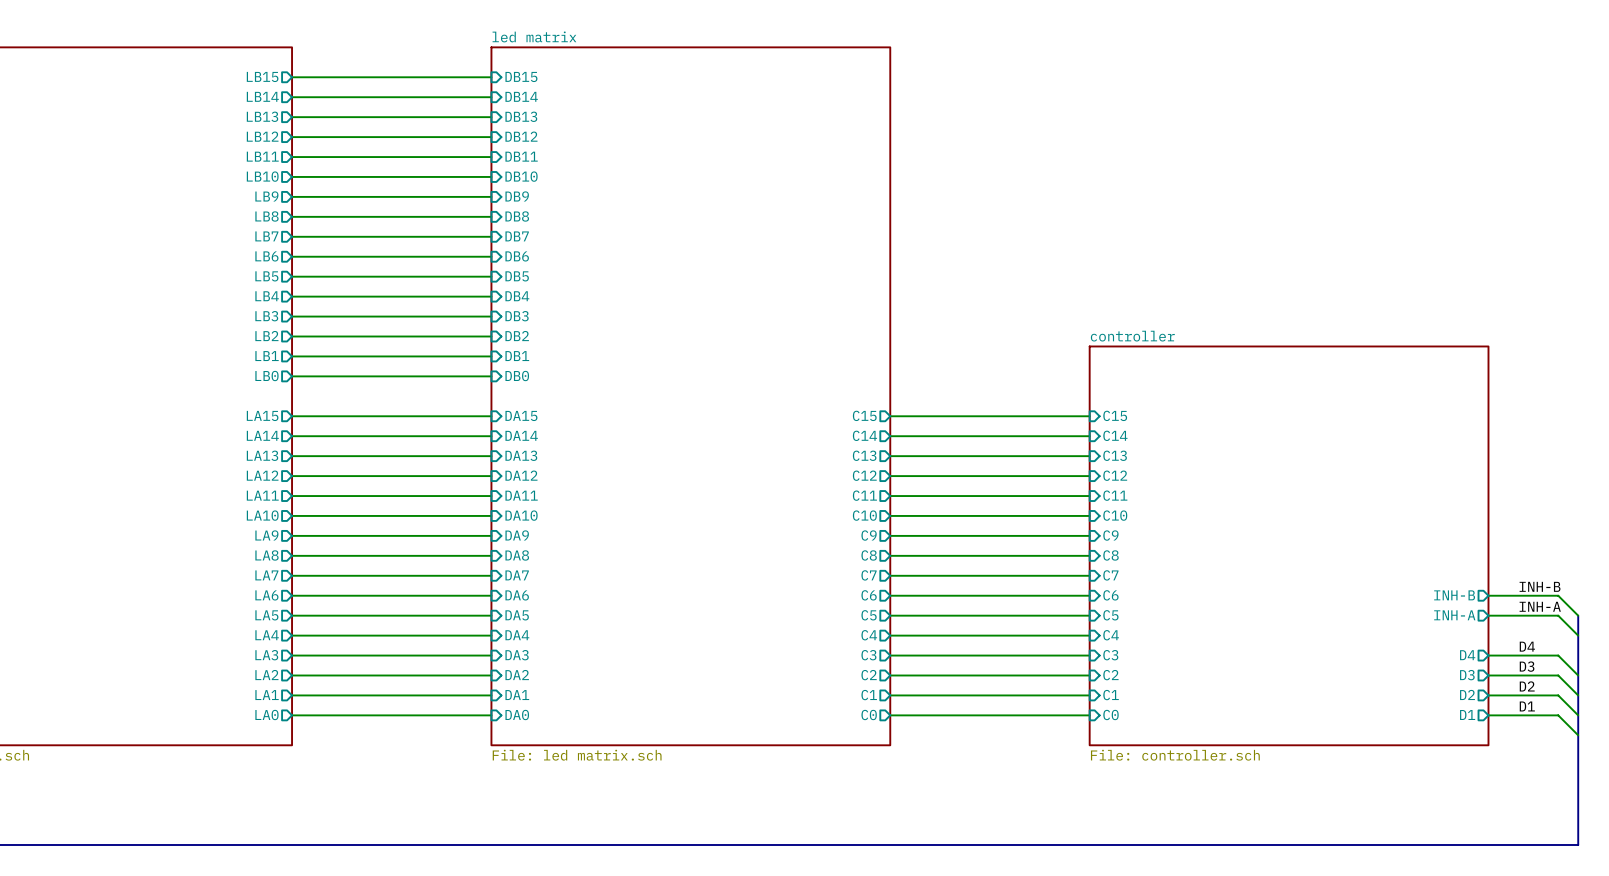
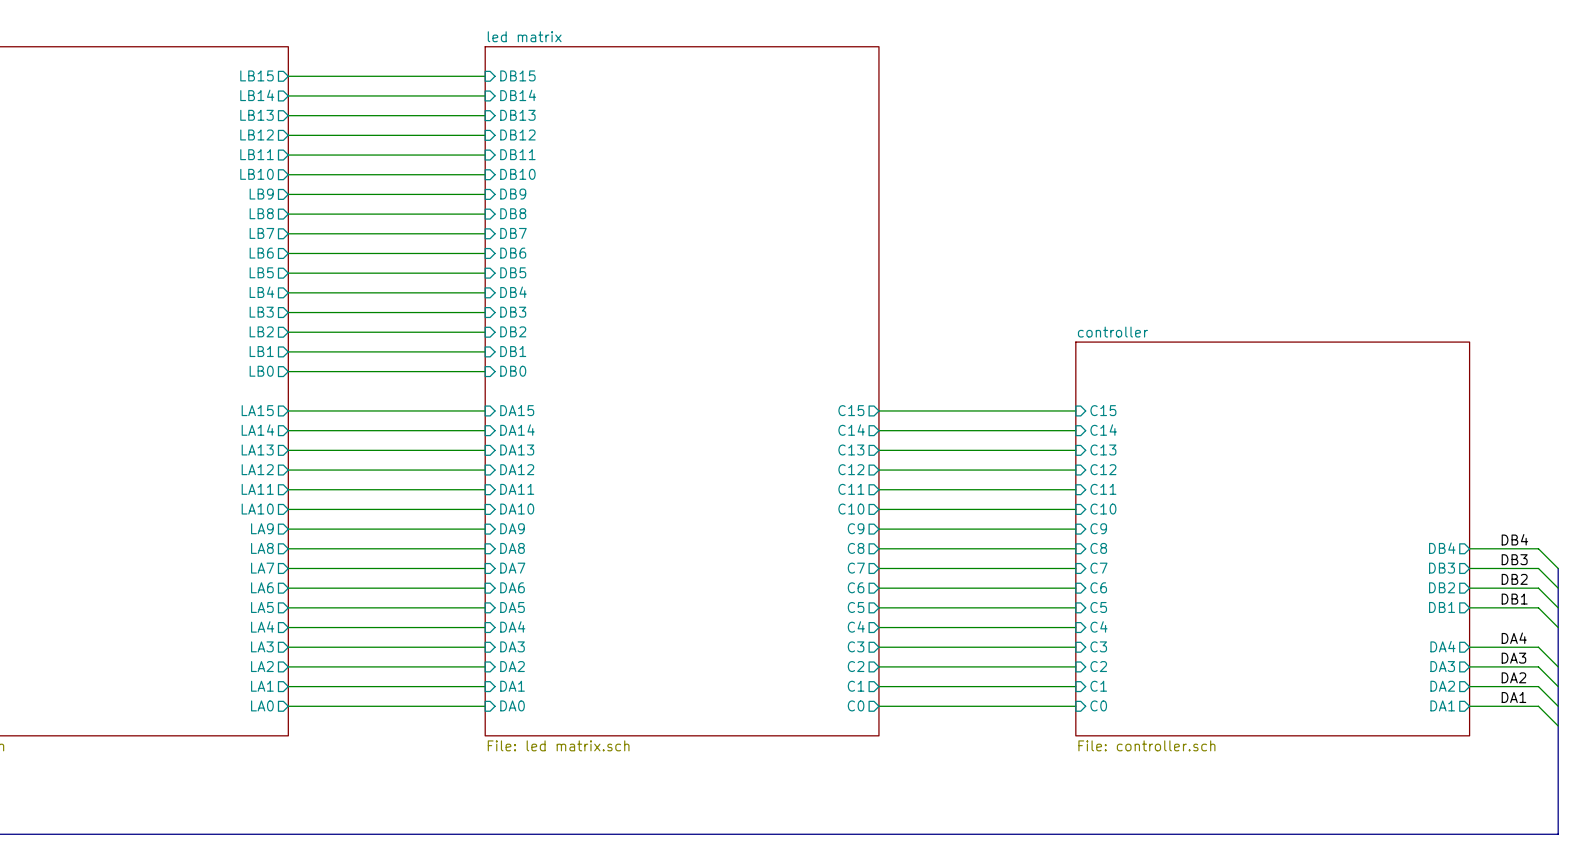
label: none -> DB4 (1514, 539)
sheet pin: none -> DB4 (1442, 548)
wire: none -> (1469, 548) (1538, 548) (1558, 568)
label: none -> DB3 (1514, 559)
sheet pin: none -> DB3 (1442, 568)
wire: none -> (1469, 568) (1538, 568) (1558, 588)
bus: none -> (1558, 568) (1558, 607)
label: INH-B (1540, 586) -> DB2 (1514, 579)
sheet pin: INH-B (1454, 595) -> DB2 (1442, 587)
label: INH-A (1540, 606) -> DB1 (1514, 599)
sheet pin: INH-A (1454, 615) -> DB1 (1442, 607)
label: D4 (1527, 646) -> DA4 (1514, 638)
sheet pin: D4 (1467, 655) -> DA4 (1442, 646)
label: D3 (1527, 666) -> DA3 (1513, 658)
sheet pin: D3 (1467, 675) -> DA3 (1442, 666)
label: D2 (1527, 686) -> DA2 (1513, 677)
sheet pin: D2 (1467, 694) -> DA2 (1442, 686)
label: D1 (1527, 706) -> DA1 (1513, 697)
sheet pin: D1 (1467, 715) -> DA1 (1442, 705)

